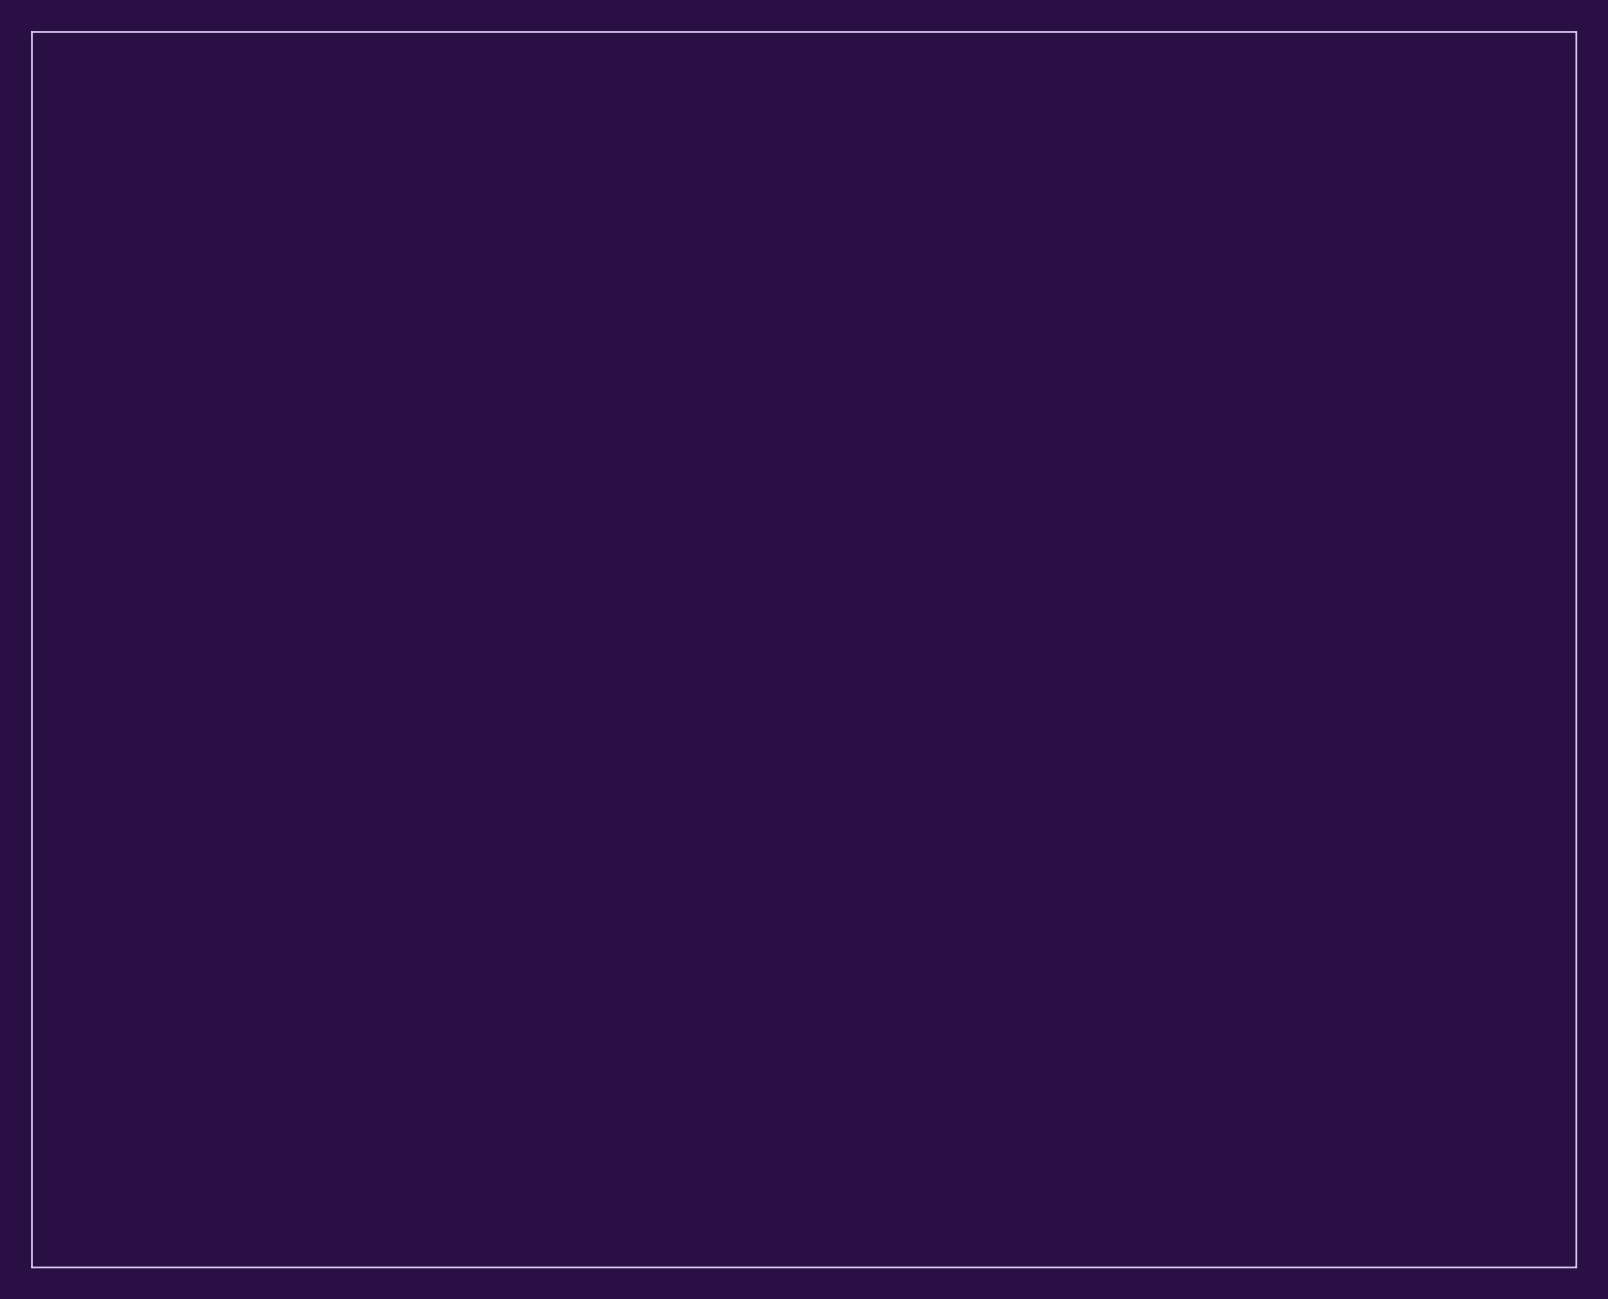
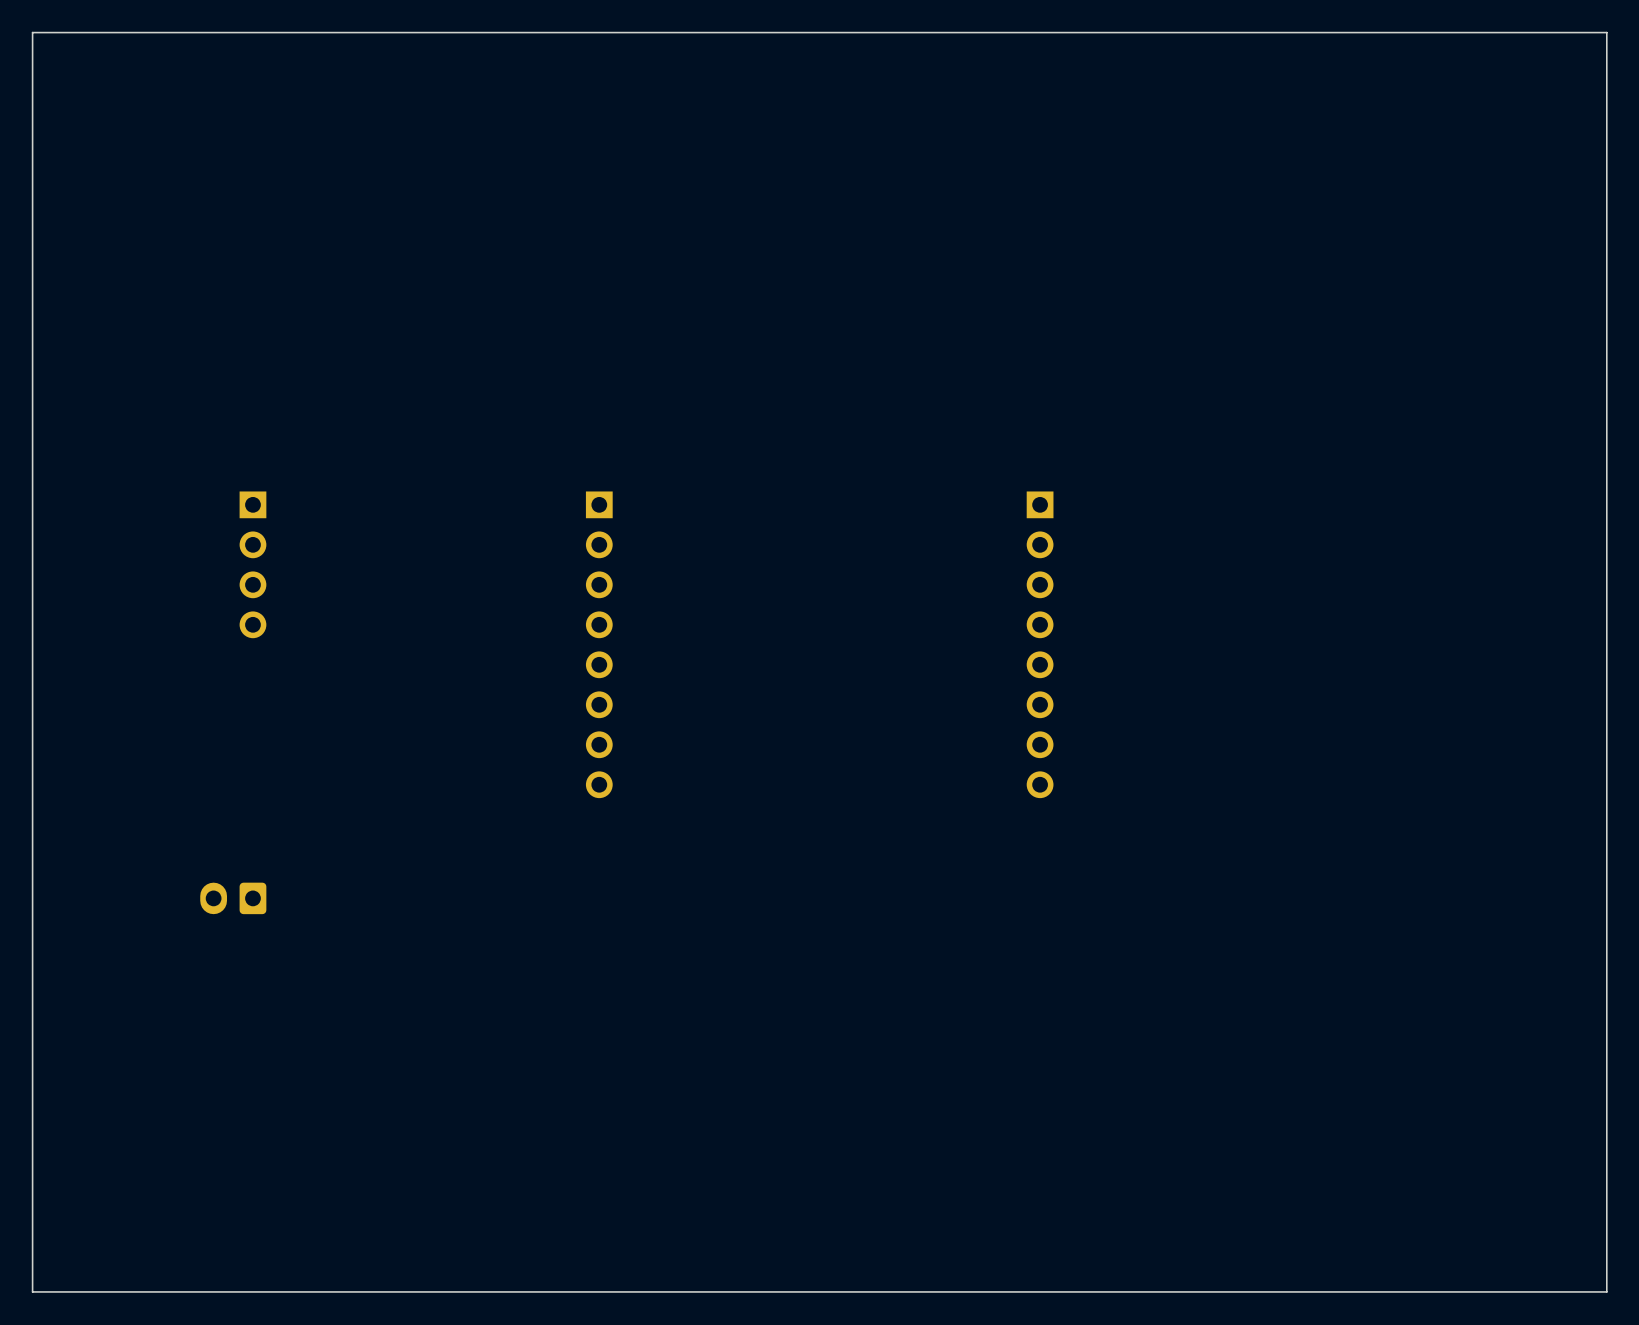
part: none -> (252, 564)
part: none -> (599, 644)
part: none -> (1040, 644)
part: none -> (233, 898)

